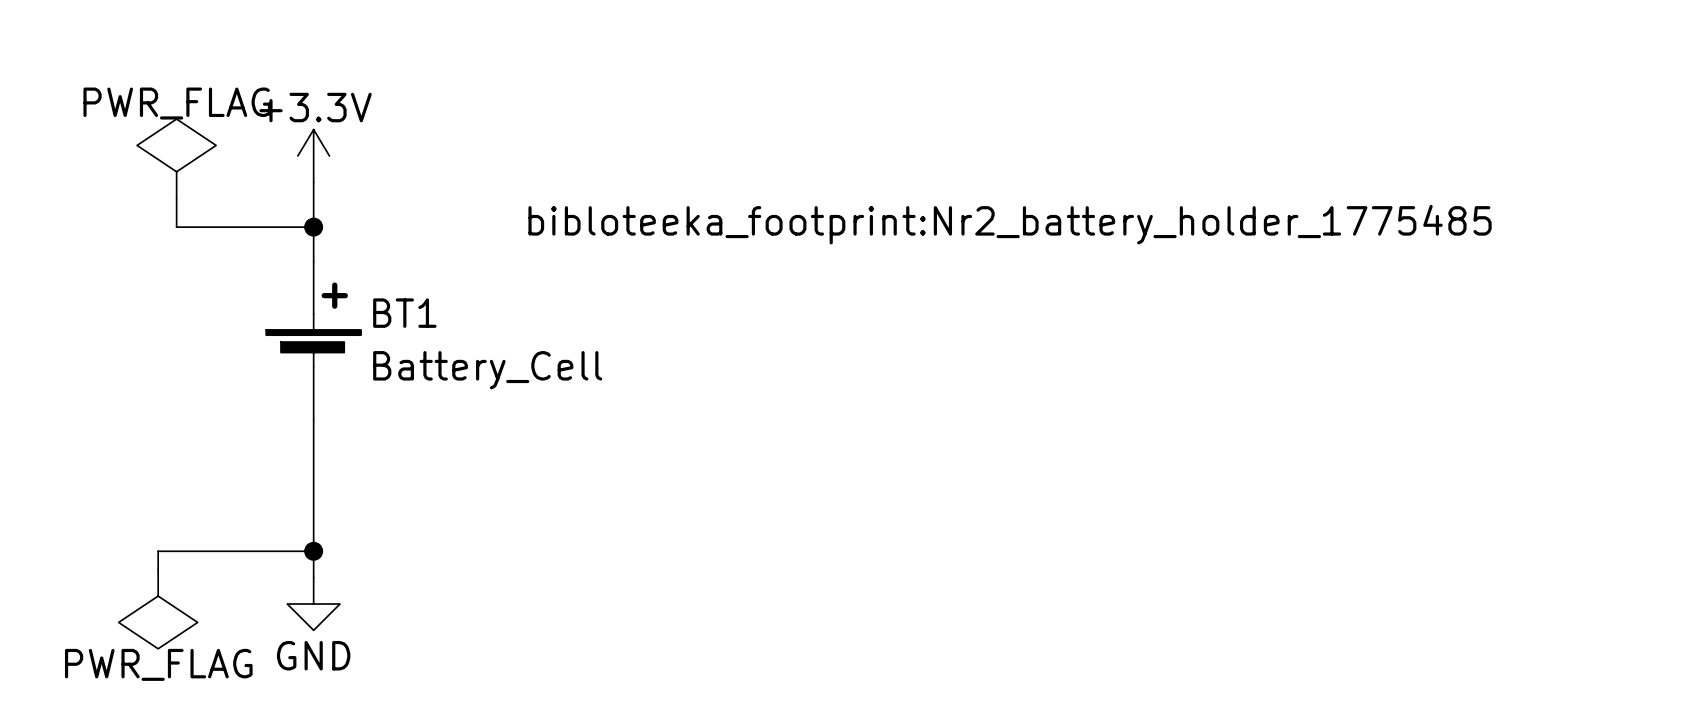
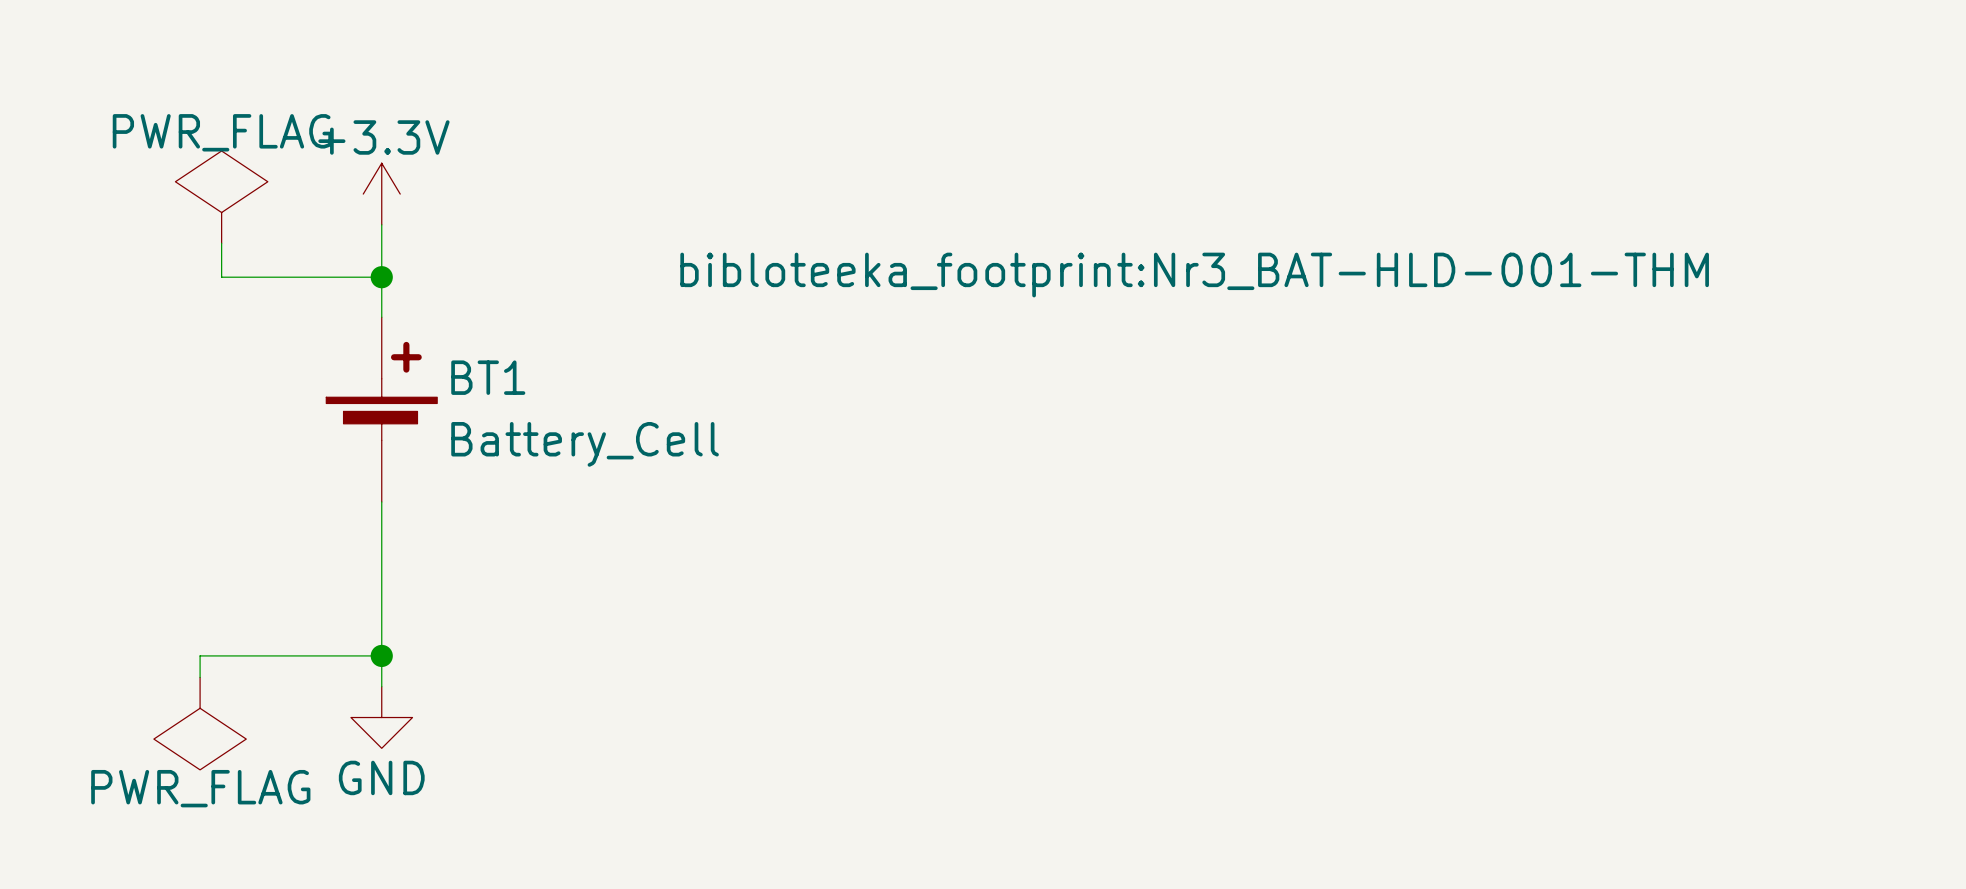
BT1 text: bibloteeka_footprint:Nr2_battery_holder_1775485 (1010, 224) -> bibloteeka_footprint:Nr3_BAT-HLD-001-THM (1194, 275)

